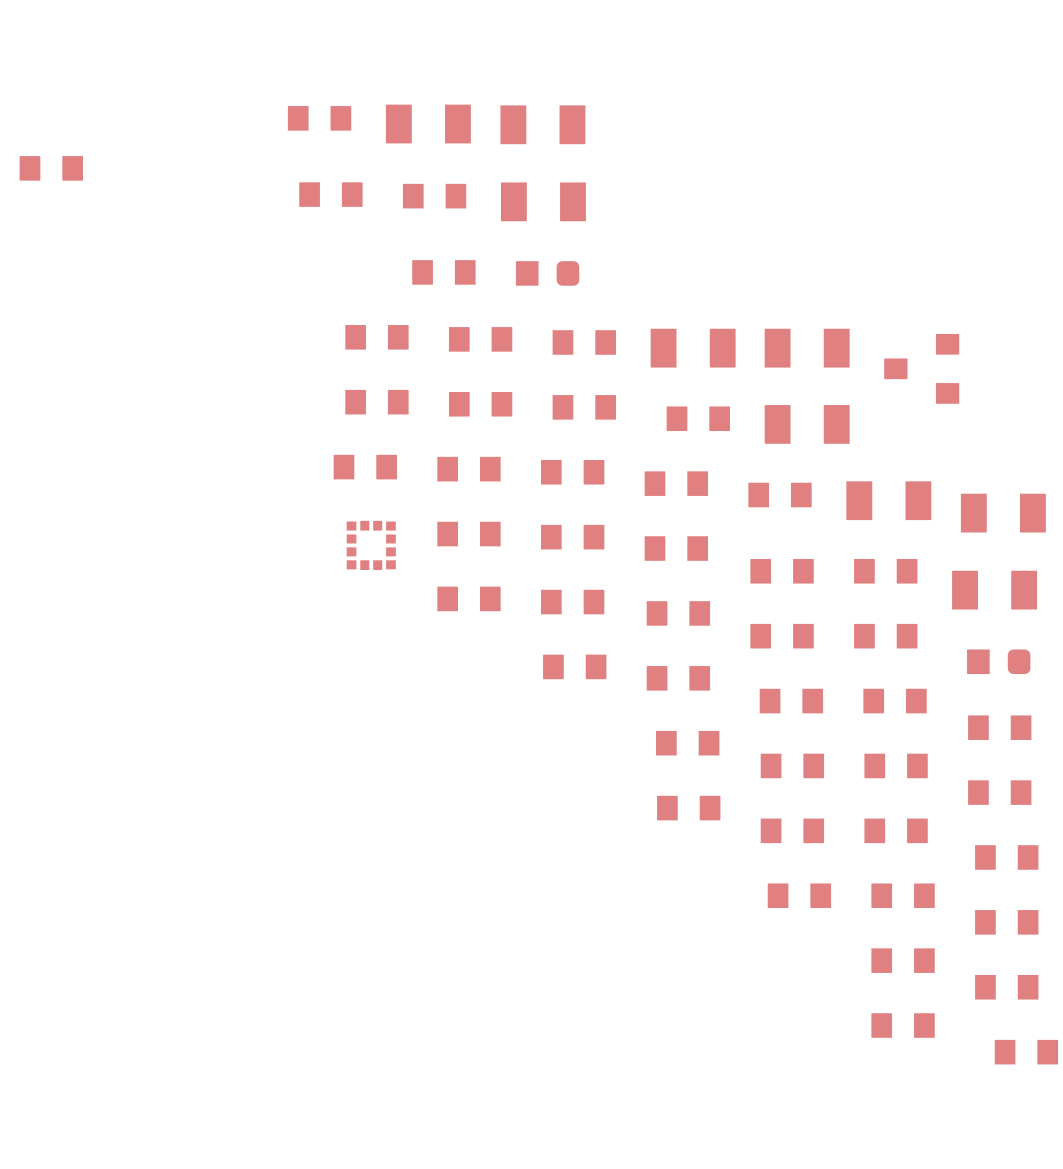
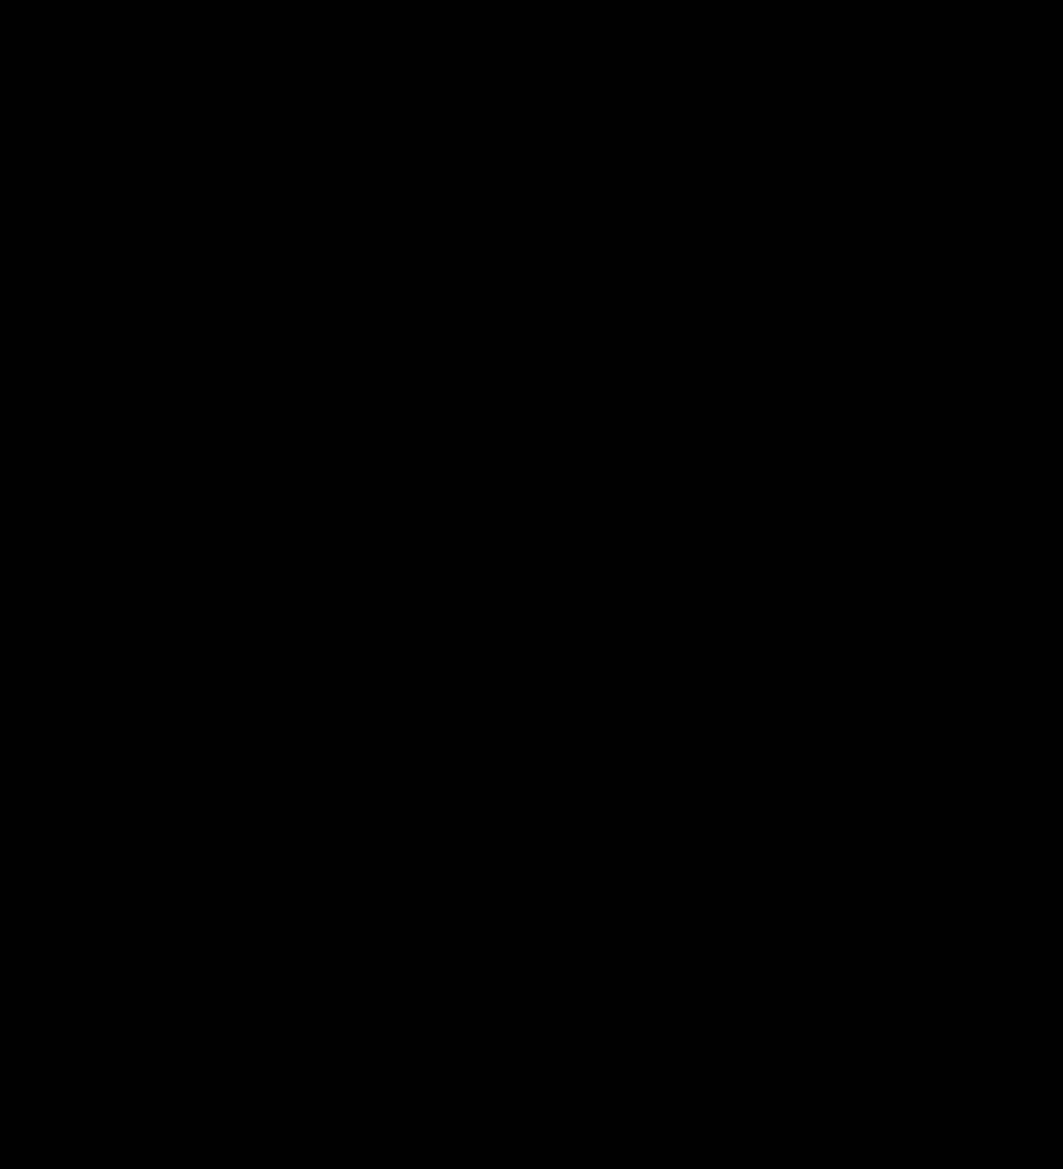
part: (319, 118) -> none
part: (428, 124) -> none
part: (542, 124) -> none
part: (51, 168) -> none
part: (330, 194) -> none
part: (434, 196) -> none
part: (543, 201) -> none
part: (443, 272) -> none
part: (547, 273) -> none
part: (376, 337) -> none
part: (480, 339) -> none
part: (584, 342) -> none
part: (693, 348) -> none
part: (807, 348) -> none
part: (921, 368) -> none
part: (376, 402) -> none
part: (480, 404) -> none
part: (584, 407) -> none
part: (698, 418) -> none
part: (807, 424) -> none
part: (365, 467) -> none
part: (468, 469) -> none
part: (572, 472) -> none
part: (676, 483) -> none
part: (780, 495) -> none
part: (888, 500) -> none
part: (1003, 513) -> none
part: (468, 534) -> none
part: (572, 537) -> none
part: (371, 545) -> none
part: (676, 548) -> none
part: (782, 571) -> none
part: (885, 571) -> none
part: (994, 590) -> none
part: (468, 598) -> none
part: (572, 602) -> none
part: (678, 613) -> none
part: (782, 636) -> none
part: (885, 636) -> none
part: (998, 661) -> none
part: (574, 666) -> none
part: (678, 678) -> none
part: (791, 701) -> none
part: (895, 701) -> none
part: (999, 727) -> none
part: (687, 743) -> none
part: (792, 765) -> none
part: (896, 765) -> none
part: (999, 792) -> none
part: (688, 808) -> none
part: (792, 830) -> none
part: (896, 830) -> none
part: (1006, 857) -> none
part: (799, 895) -> none
part: (903, 895) -> none
part: (1006, 922) -> none
part: (903, 960) -> none
part: (1006, 987) -> none
part: (903, 1025) -> none
part: (1026, 1052) -> none

